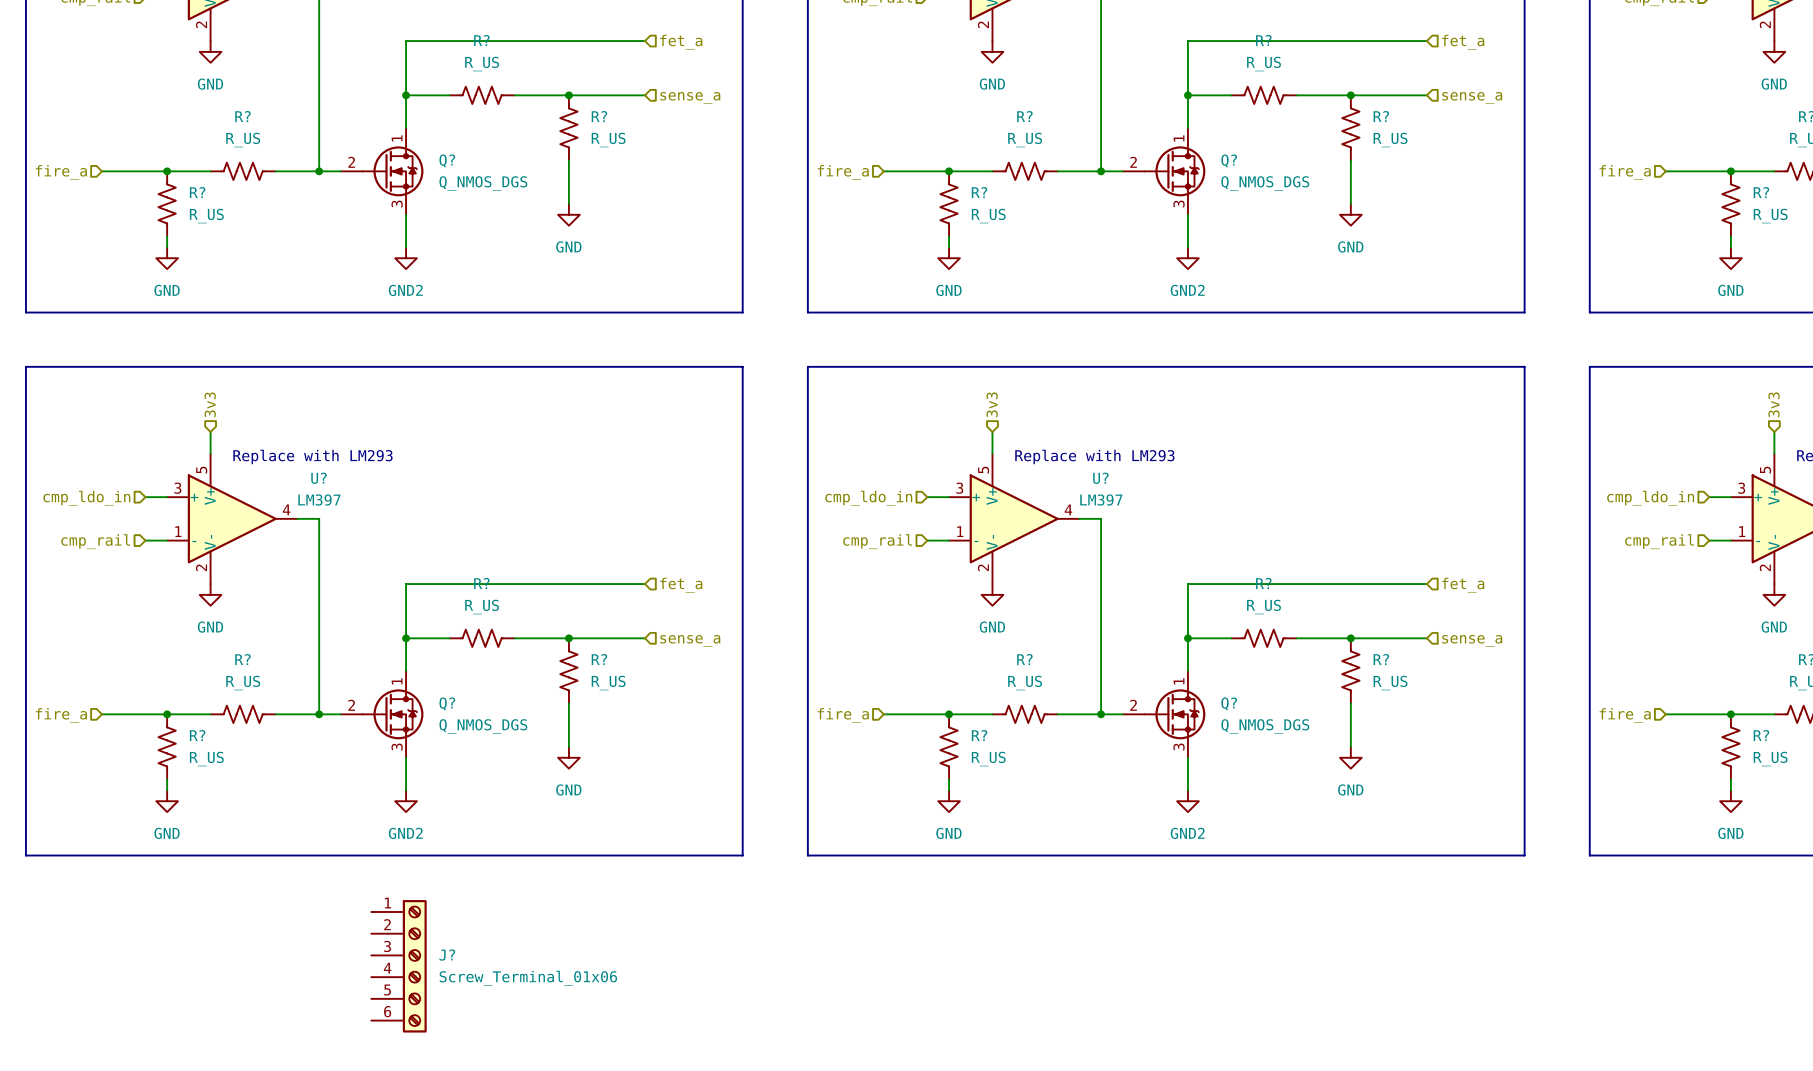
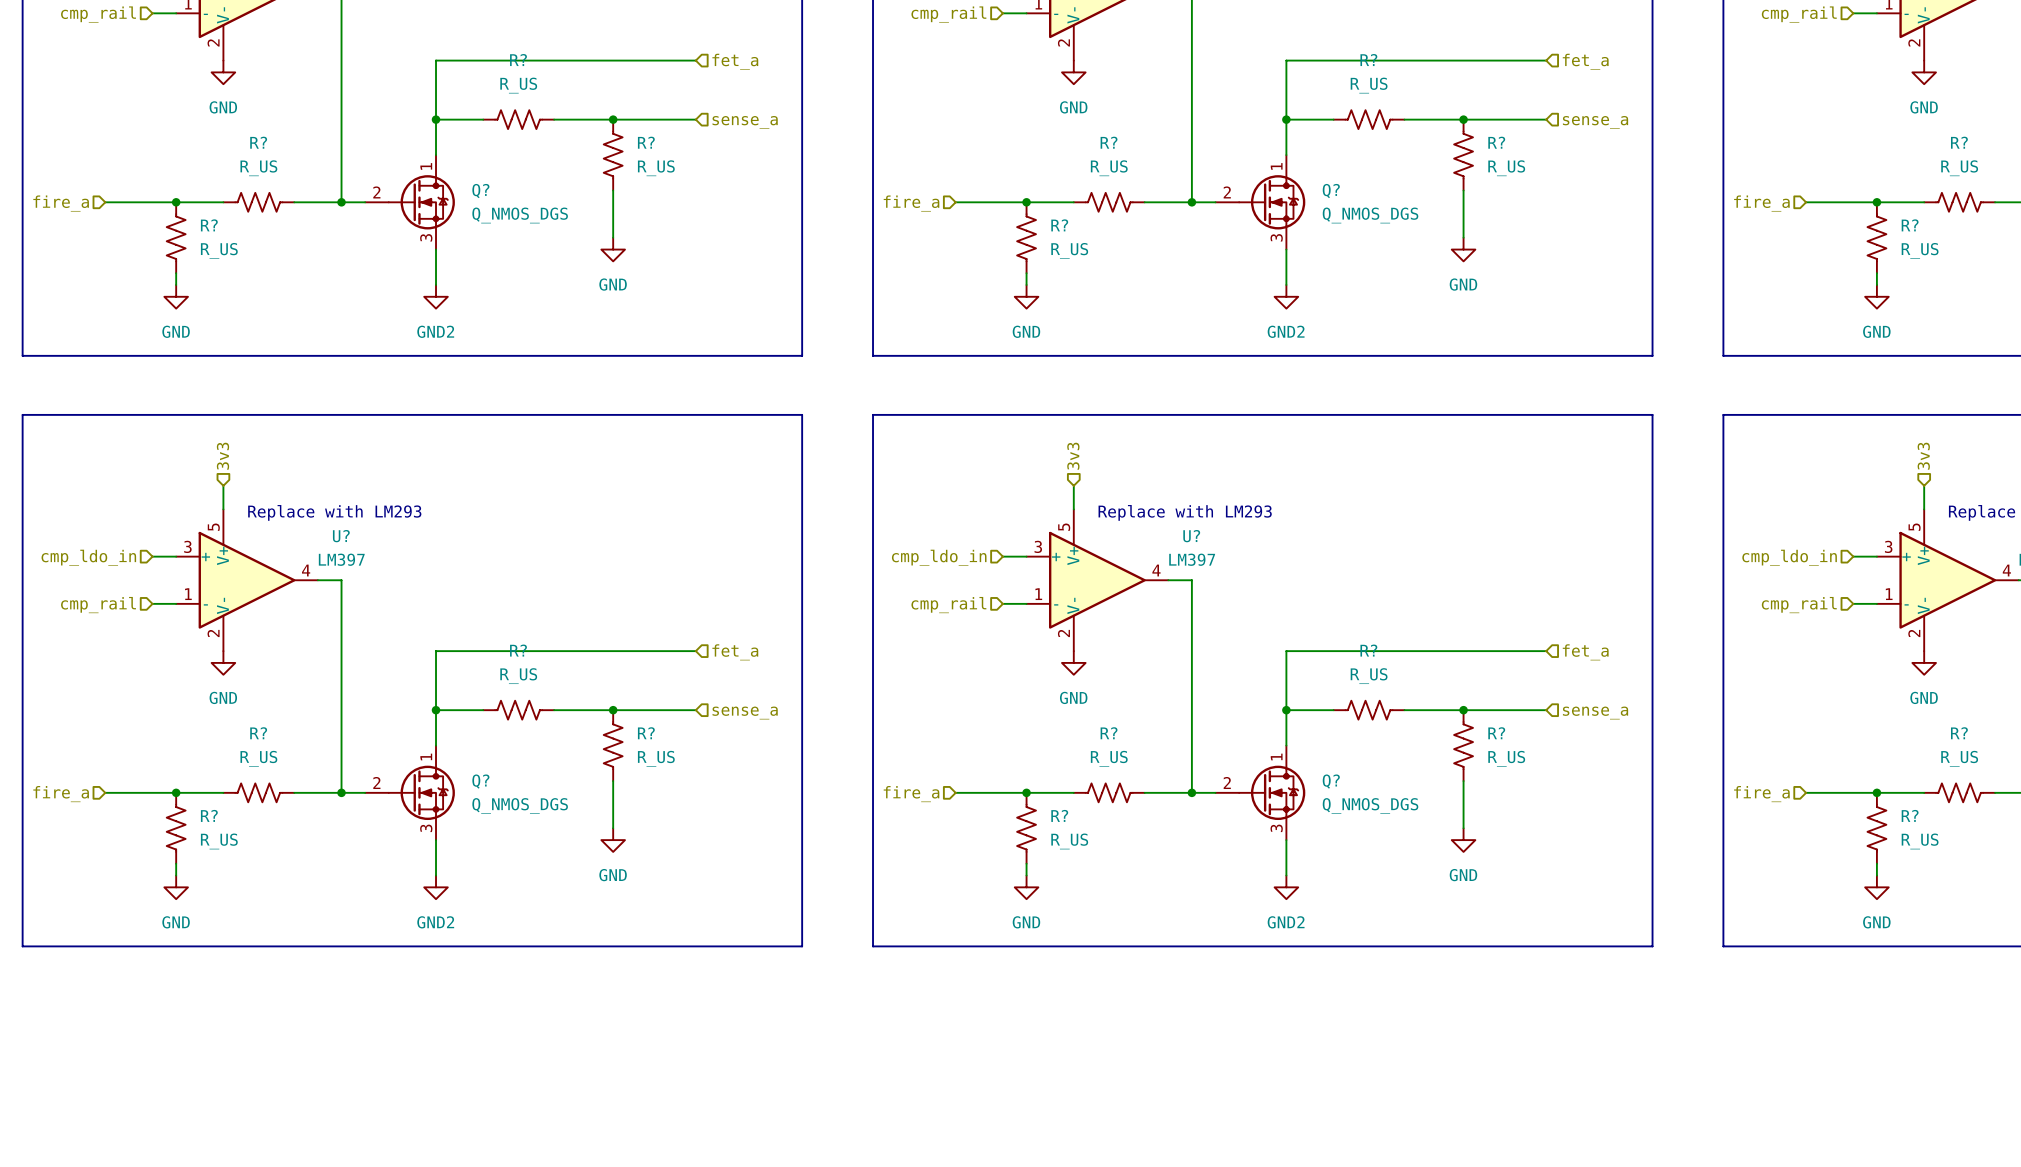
J?: Screw_Terminal_01x06 (399, 966) -> none

